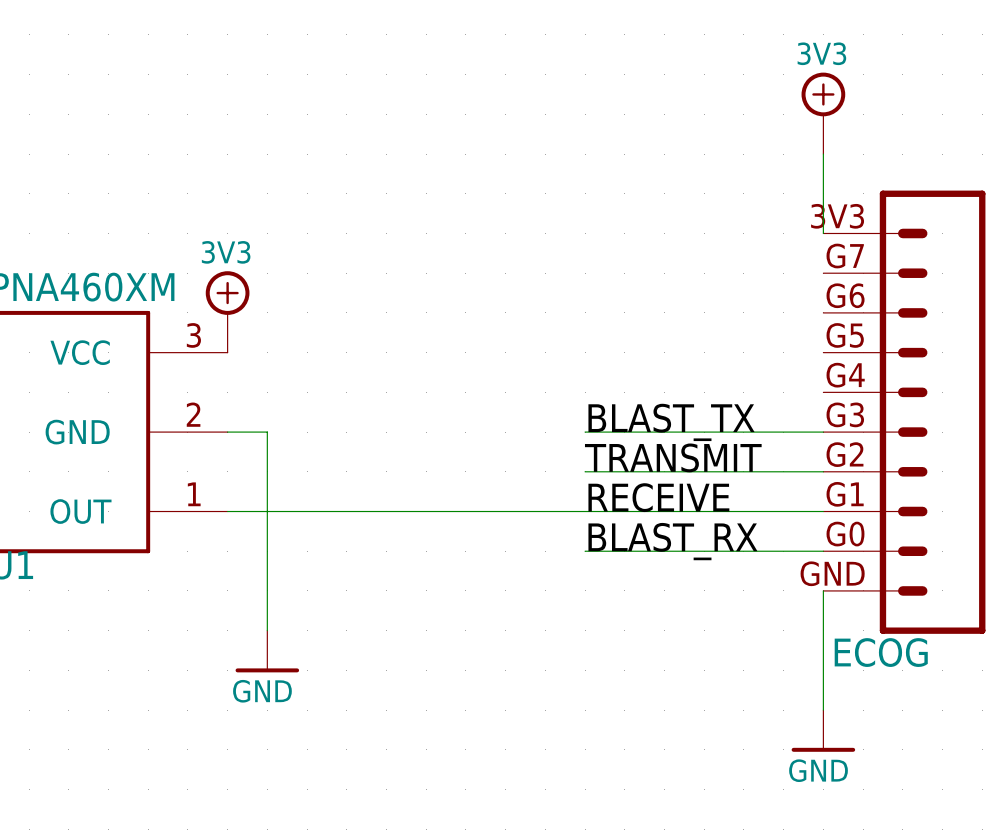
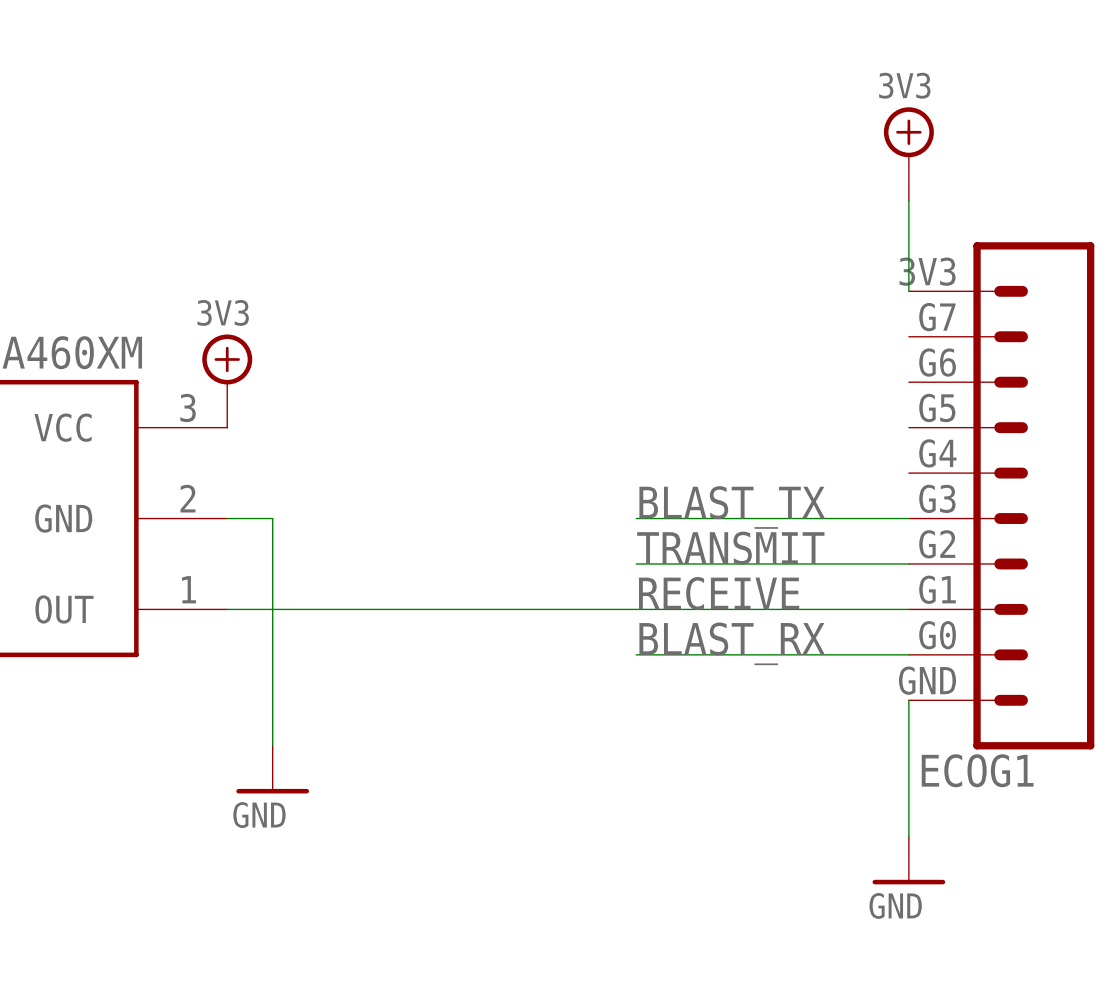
ECOG name: ECOG (881, 652) -> ECOG1 (977, 770)

